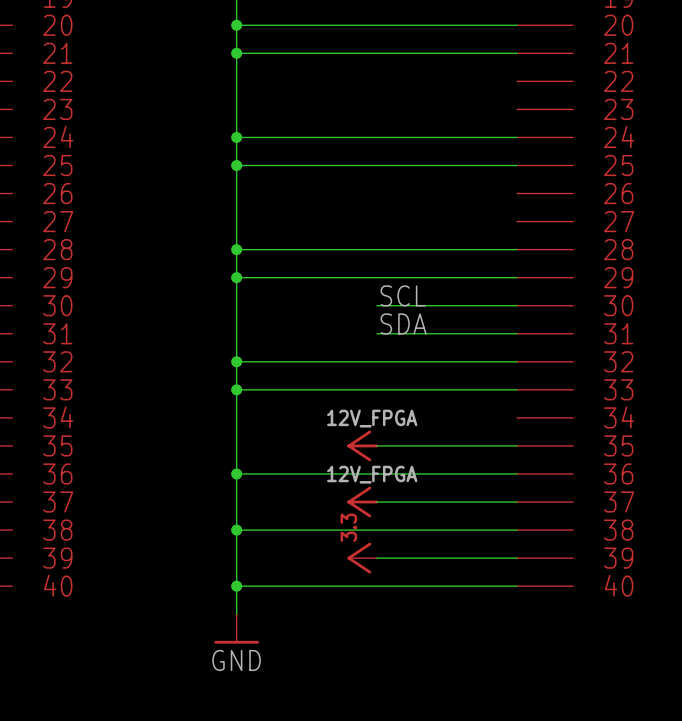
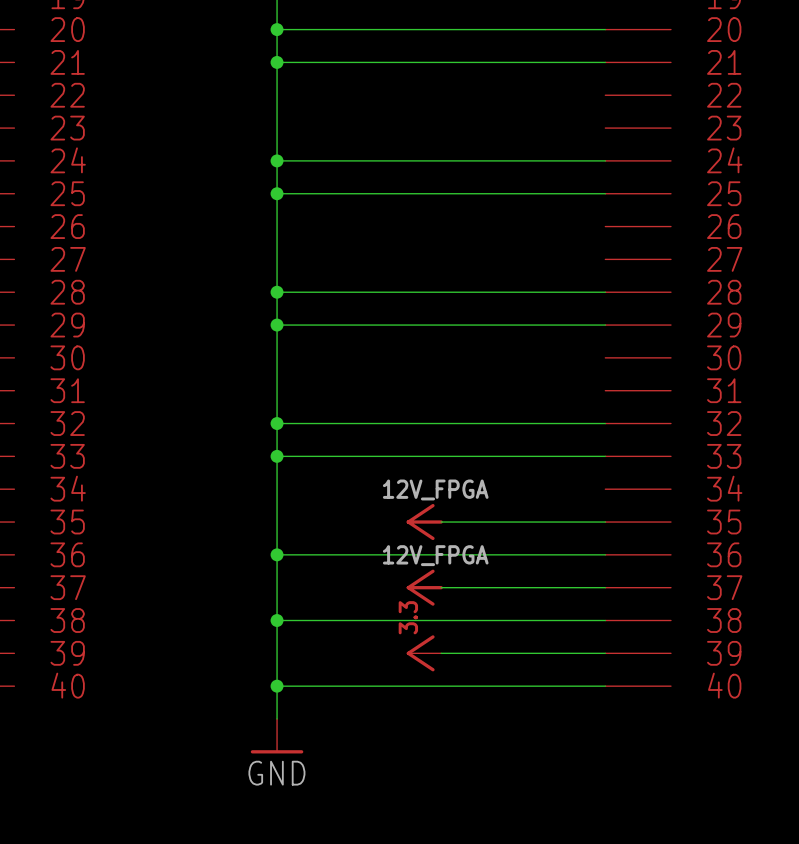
label: SCL (403, 295) -> none
wire: (376, 305) (517, 305) -> none
label: SDA (403, 323) -> none
wire: (376, 333) (517, 333) -> none

